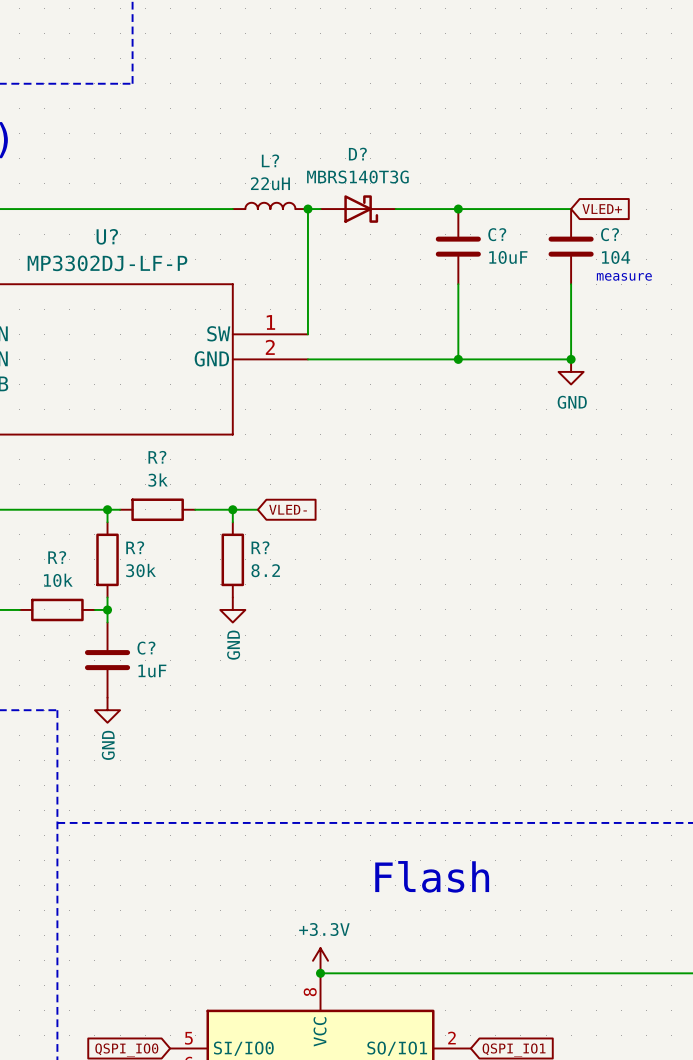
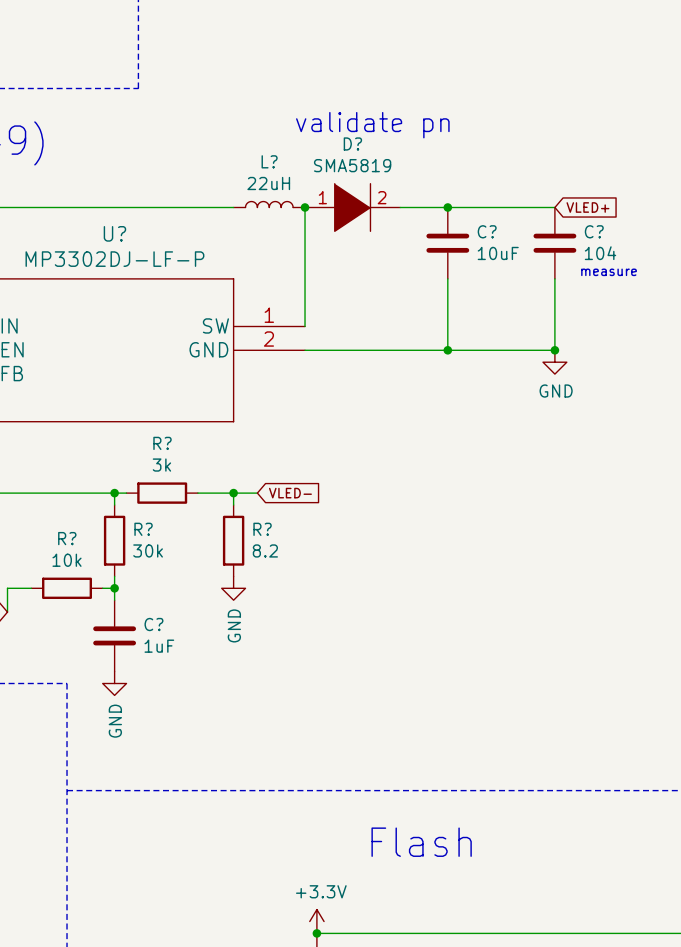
text: none -> validate pn (372, 125)
D? value: MBRS140T3G (357, 177) -> SMA5819 (352, 165)
D? symbol: [320, 195, 396, 223] -> [305, 183, 401, 232]

